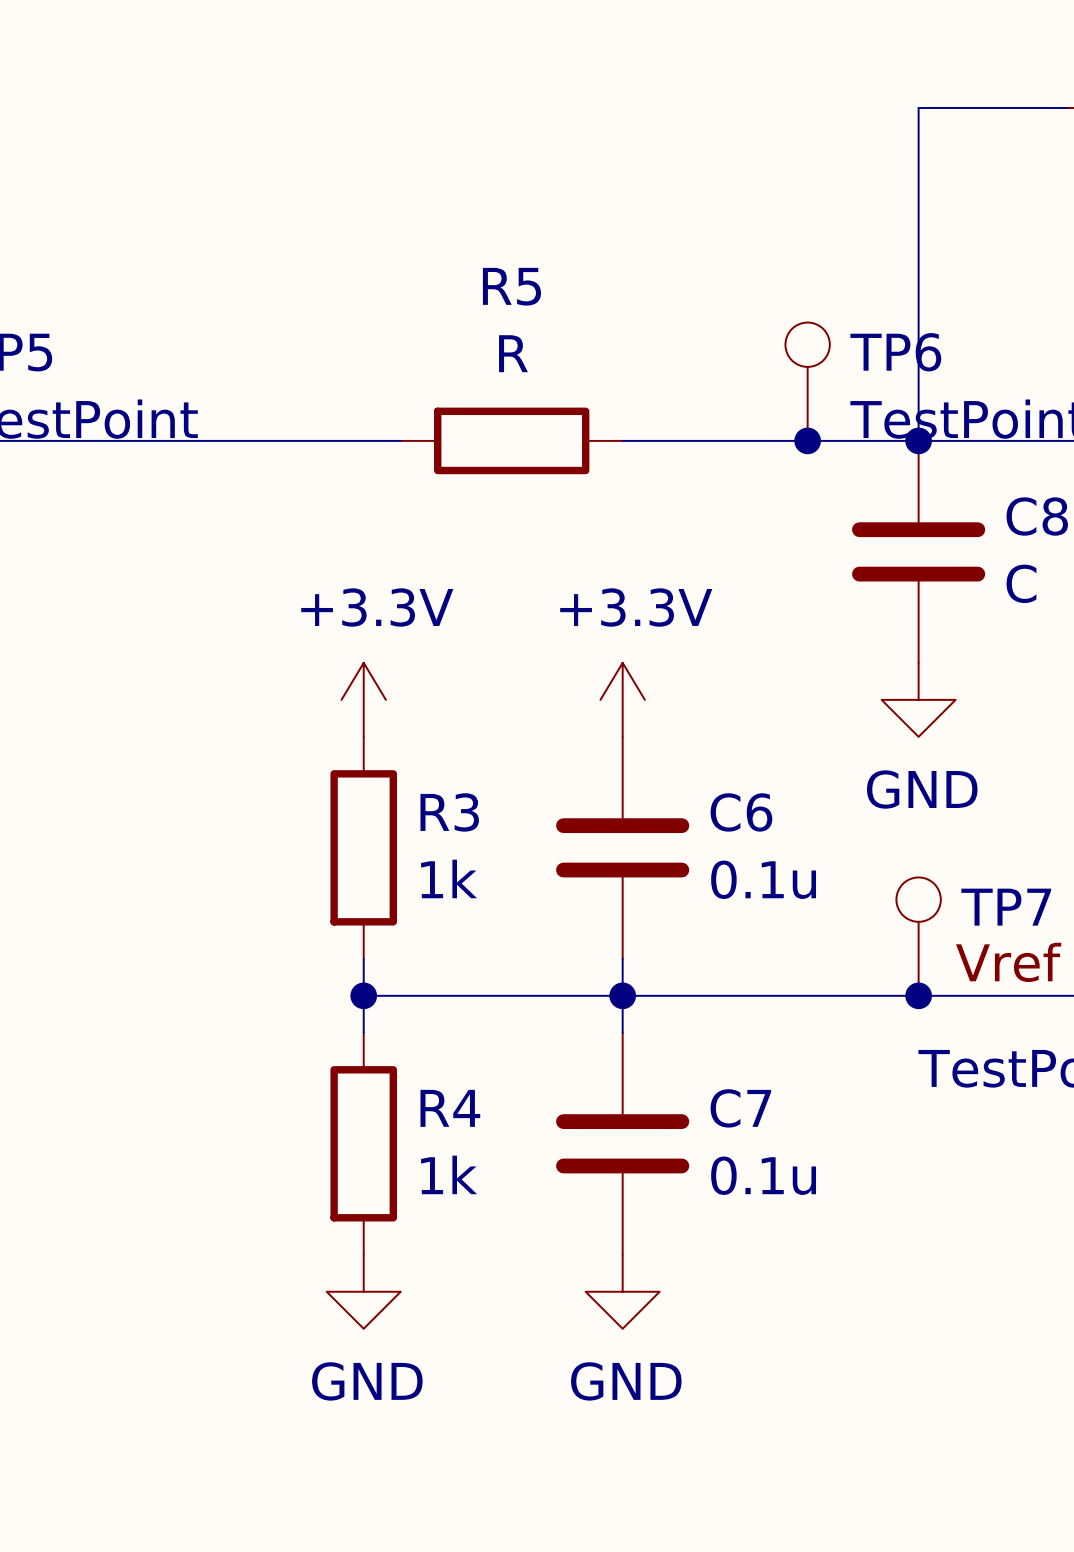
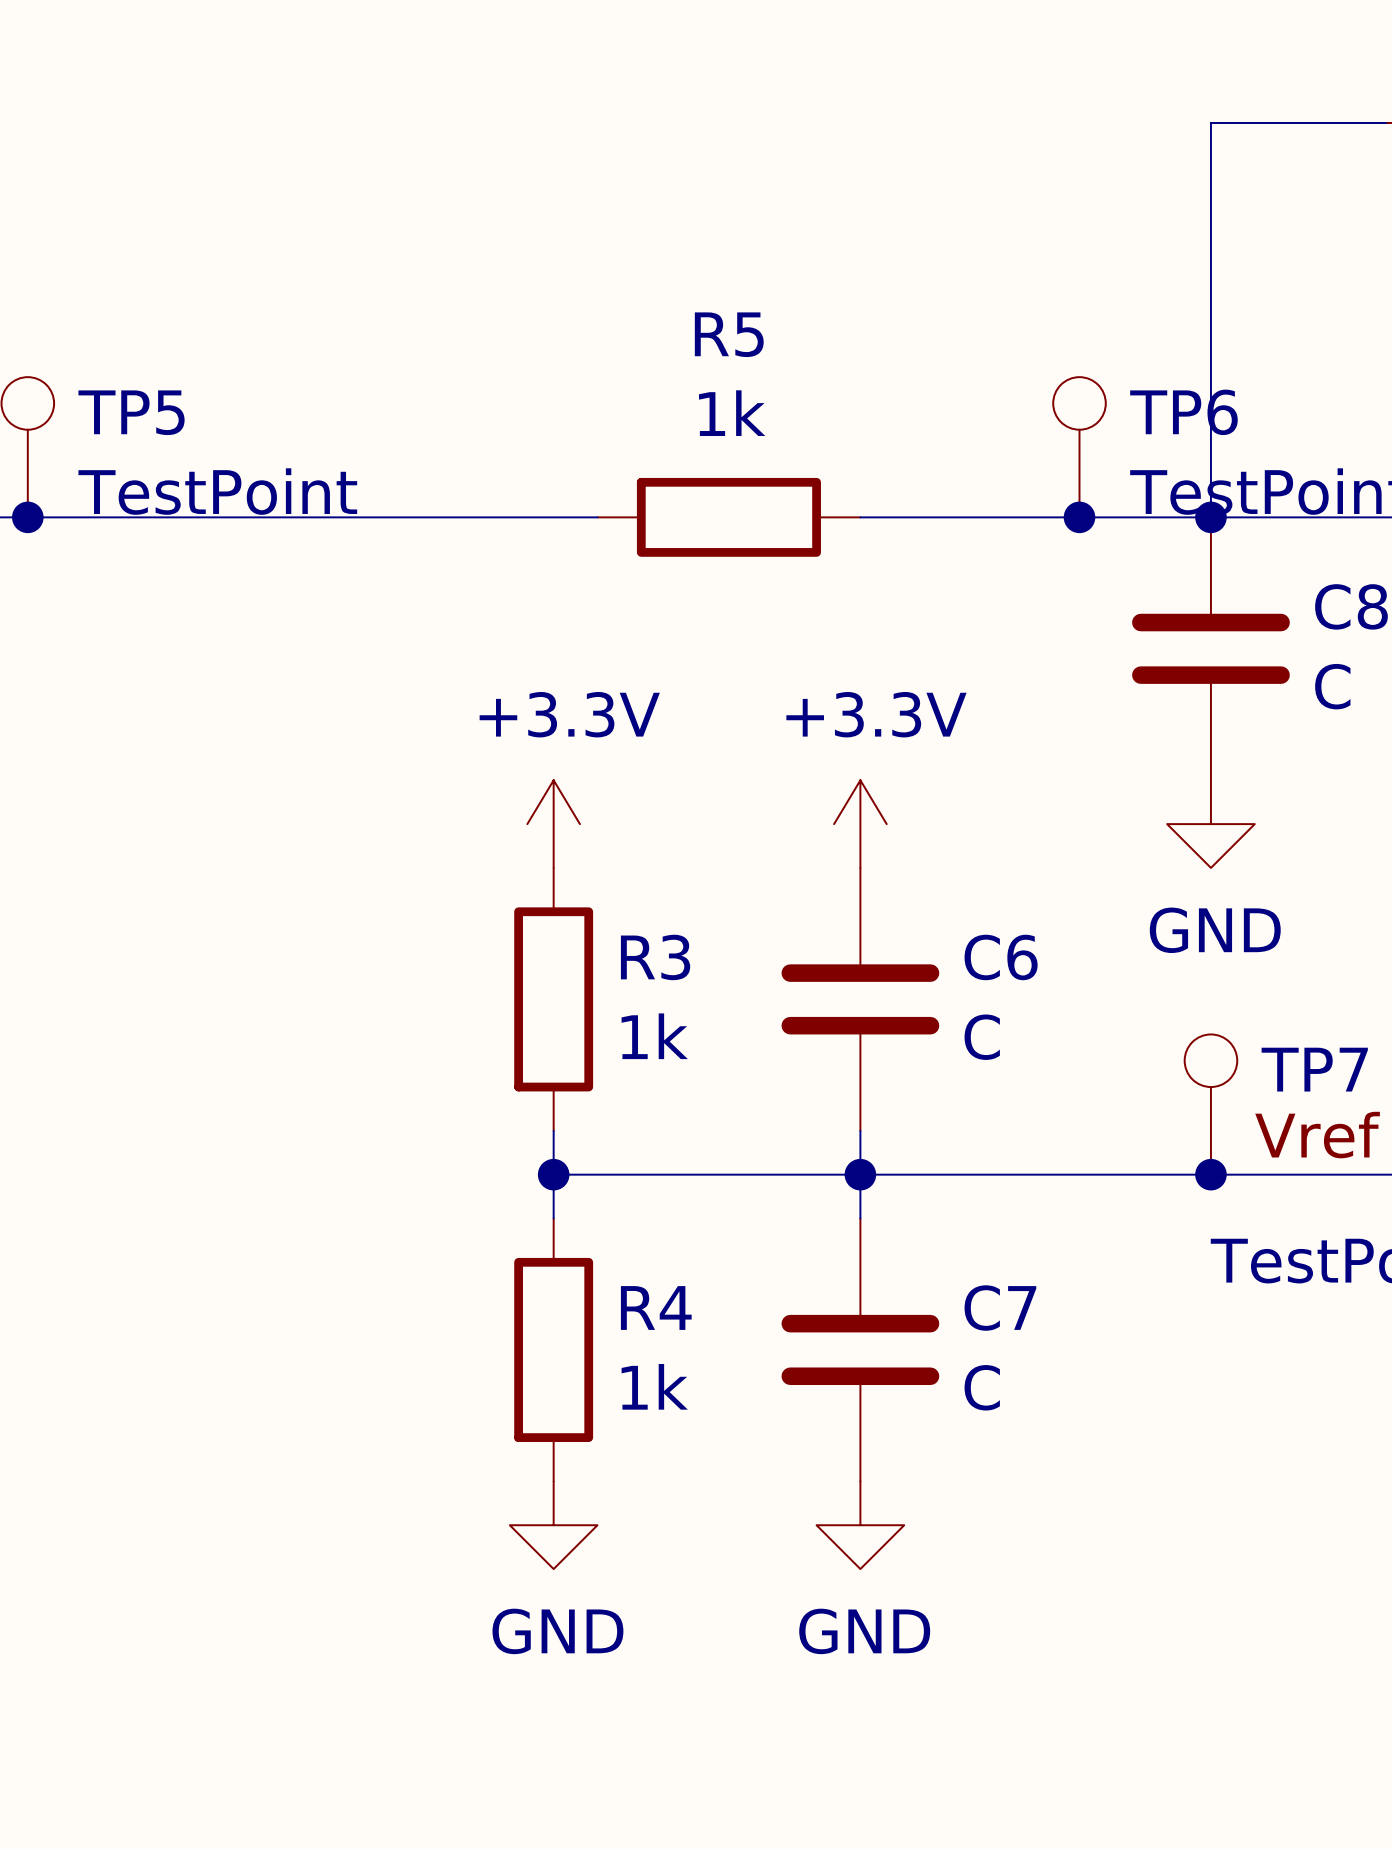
R5 value: R (513, 353) -> 1k (732, 413)
C6 value: 0.1u (763, 879) -> C (982, 1037)
C7 value: 0.1u (763, 1175) -> C (982, 1387)

